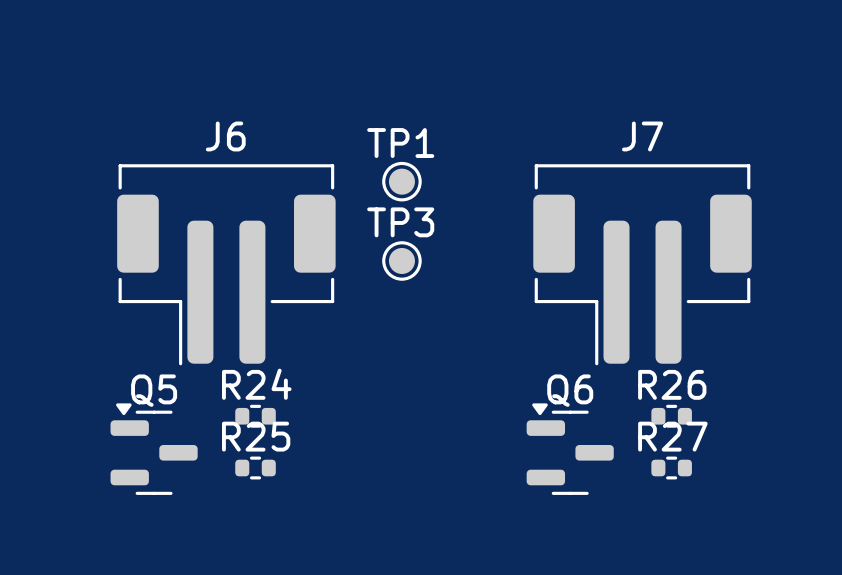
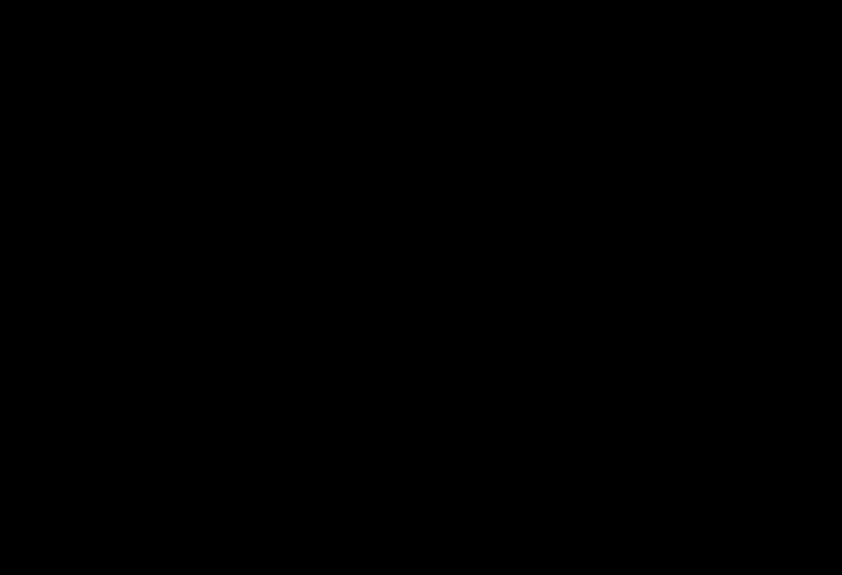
TP1: (401, 181) -> none
TP3: (401, 260) -> none
J6: (226, 264) -> none
J7: (642, 264) -> none
R24: (255, 416) -> none
R26: (671, 416) -> none
Q5: (154, 449) -> none
Q6: (570, 449) -> none
R25: (255, 468) -> none
R27: (671, 468) -> none

